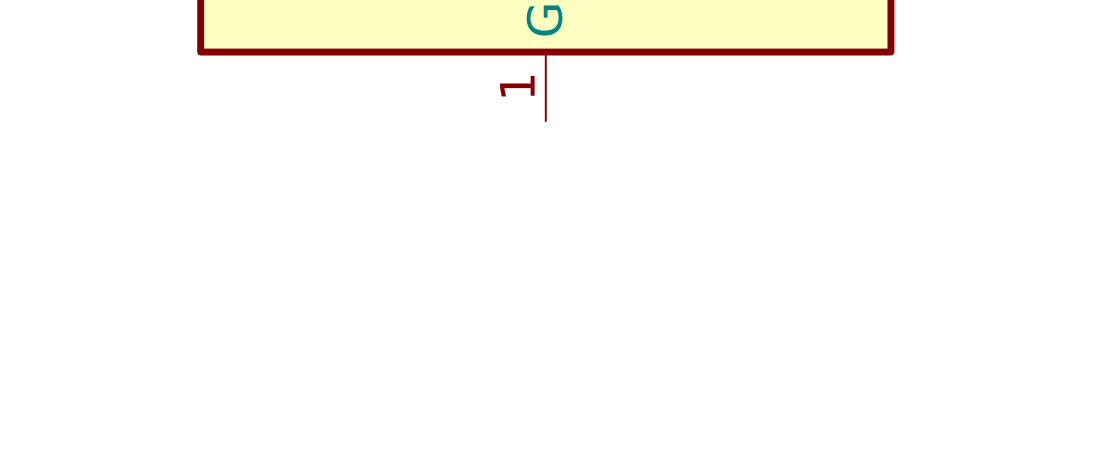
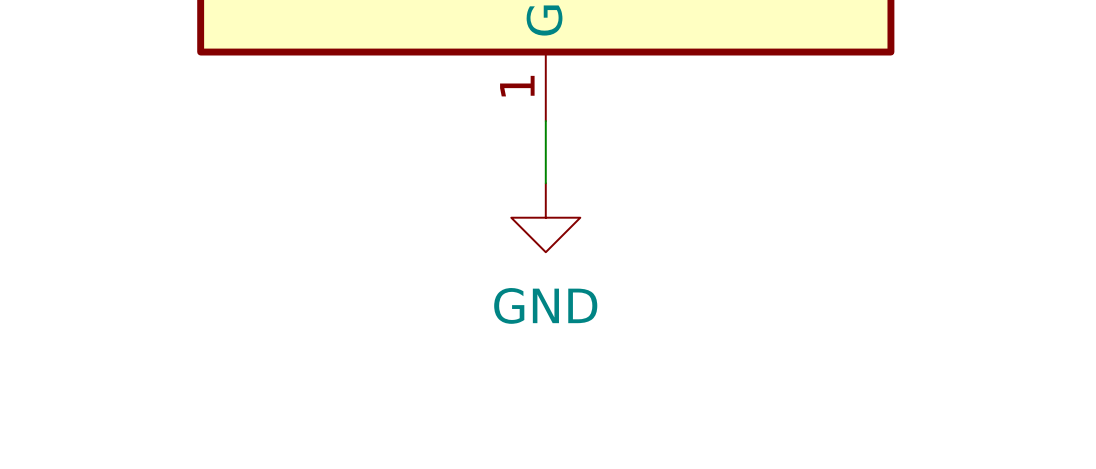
wire: none -> (545, 121) (545, 183)
power symbol: none -> GND (545, 217)

